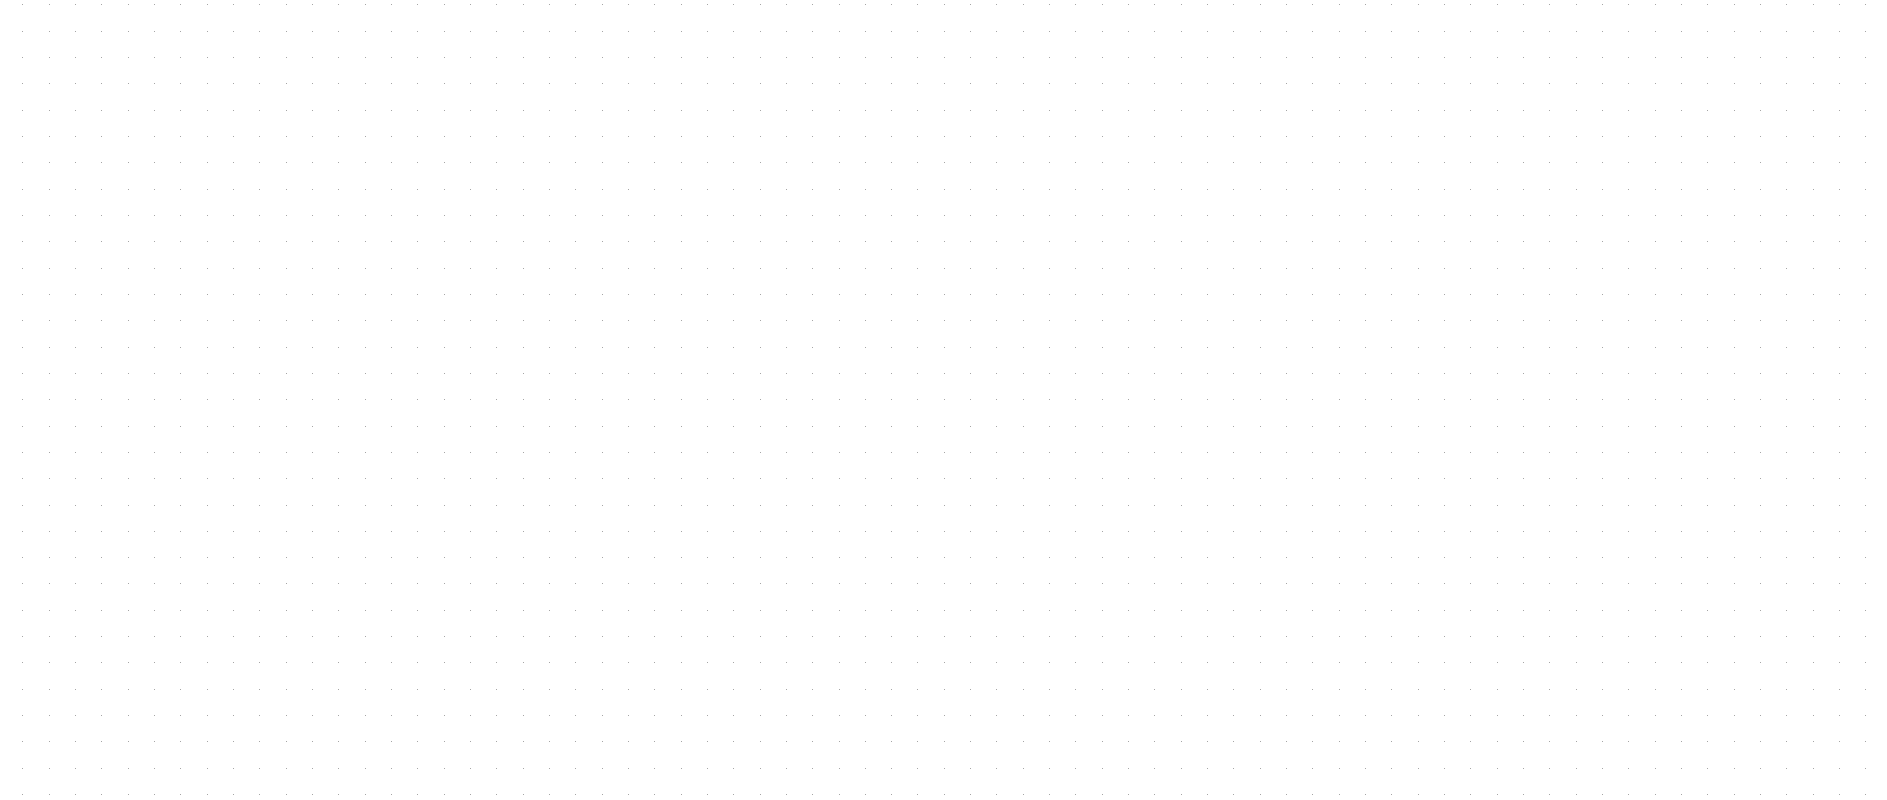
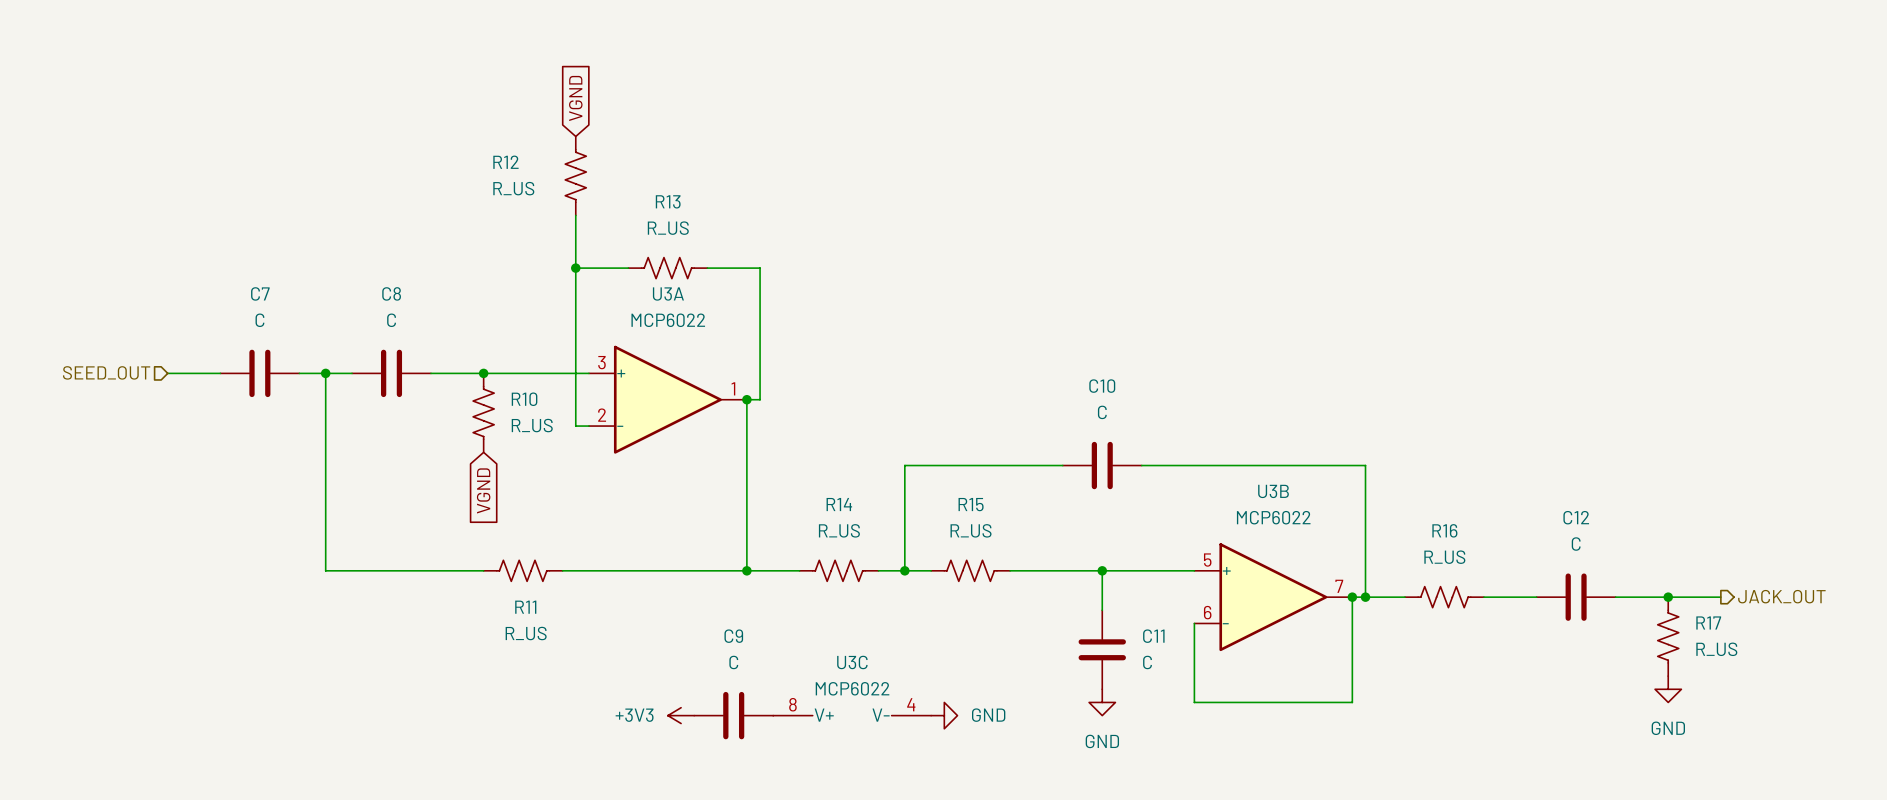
global label: none -> VGND (575, 98)
R12: none -> R_US (575, 175)
wire: none -> (575, 215) (575, 426) (588, 426)
wire: none -> (575, 268) (628, 268)
junction: none -> (575, 268)
R13: none -> R_US (667, 268)
wire: none -> (707, 268) (760, 268) (760, 399) (746, 399) (746, 570)
wire: none -> (167, 373) (220, 373)
C7: none -> C (259, 373)
wire: none -> (299, 373) (352, 373)
wire: none -> (325, 373) (325, 570) (483, 570)
junction: none -> (325, 373)
C8: none -> C (391, 373)
wire: none -> (430, 373) (588, 373)
junction: none -> (483, 373)
hierarchical label: none -> SEED_OUT (106, 372)
U3A: none -> MCP6022 (667, 399)
junction: none -> (746, 399)
R10: none -> R_US (483, 412)
wire: none -> (1062, 465) (904, 465) (904, 570)
C10: none -> C (1102, 465)
wire: none -> (1141, 465) (1365, 465) (1365, 597)
global label: none -> VGND (483, 490)
R11: none -> R_US (523, 570)
wire: none -> (562, 570) (799, 570)
junction: none -> (746, 570)
R14: none -> R_US (839, 570)
wire: none -> (878, 570) (931, 570)
junction: none -> (904, 570)
R15: none -> R_US (970, 570)
wire: none -> (1010, 570) (1194, 570)
wire: none -> (1102, 570) (1102, 610)
junction: none -> (1102, 570)
U3B: none -> MCP6022 (1273, 597)
junction: none -> (1352, 597)
junction: none -> (1365, 597)
wire: none -> (1404, 597) (1352, 597) (1352, 702) (1194, 702) (1194, 623)
R16: none -> R_US (1444, 597)
wire: none -> (1483, 597) (1536, 597)
C12: none -> C (1576, 597)
wire: none -> (1615, 597) (1720, 597)
junction: none -> (1668, 597)
hierarchical label: none -> JACK_OUT (1781, 596)
R17: none -> R_US (1668, 636)
C11: none -> C (1102, 649)
power symbol: none -> GND (1668, 689)
power symbol: none -> GND (1102, 702)
power symbol: none -> +3V3 (681, 715)
C9: none -> C (733, 715)
U3C: none -> MCP6022 (852, 715)
power symbol: none -> GND (944, 715)

